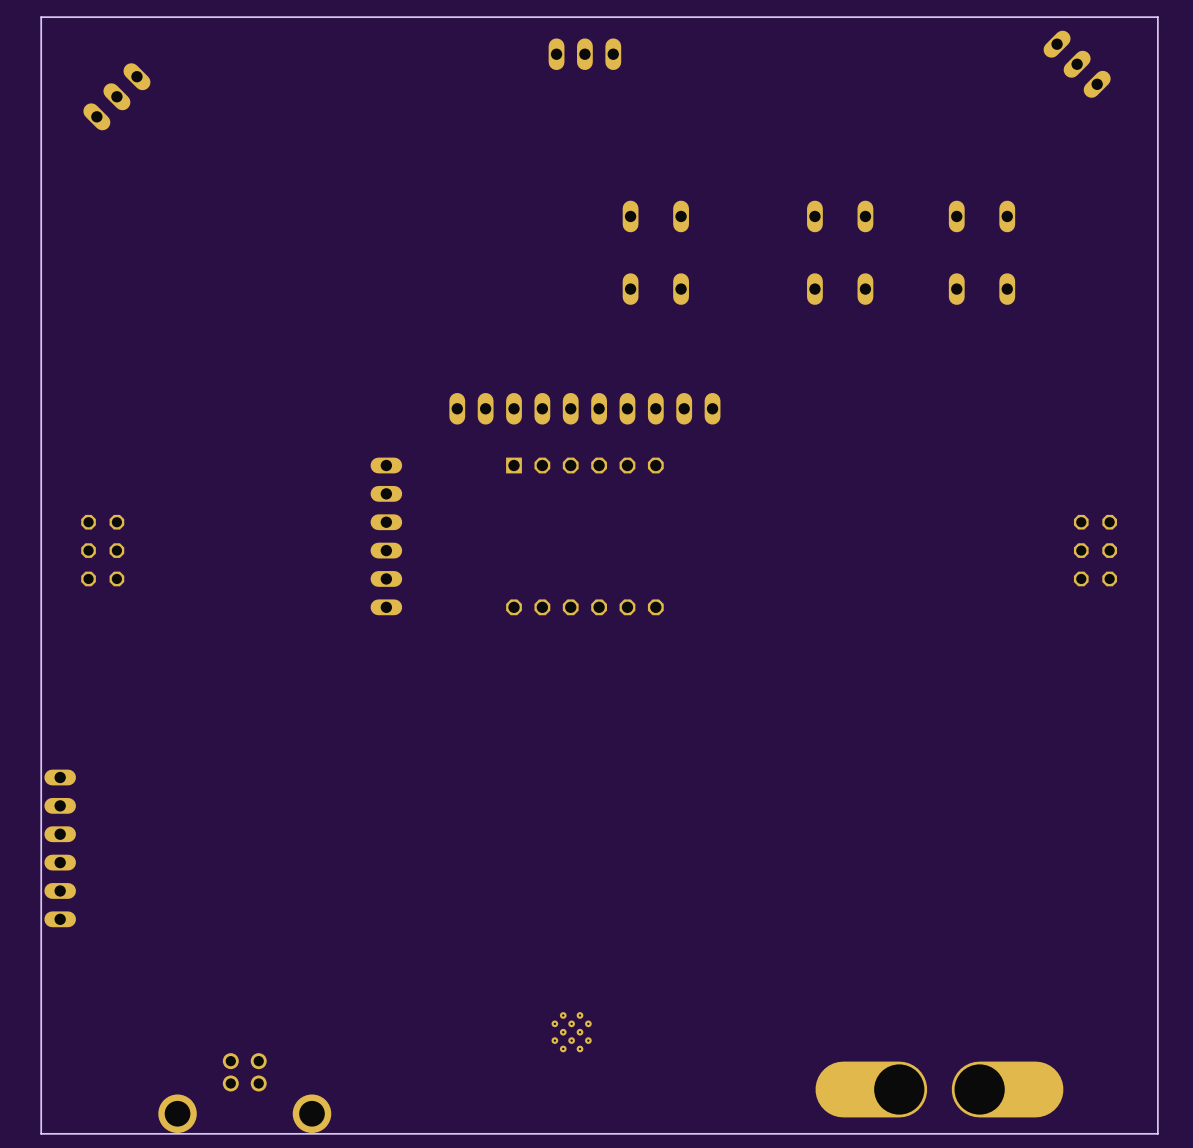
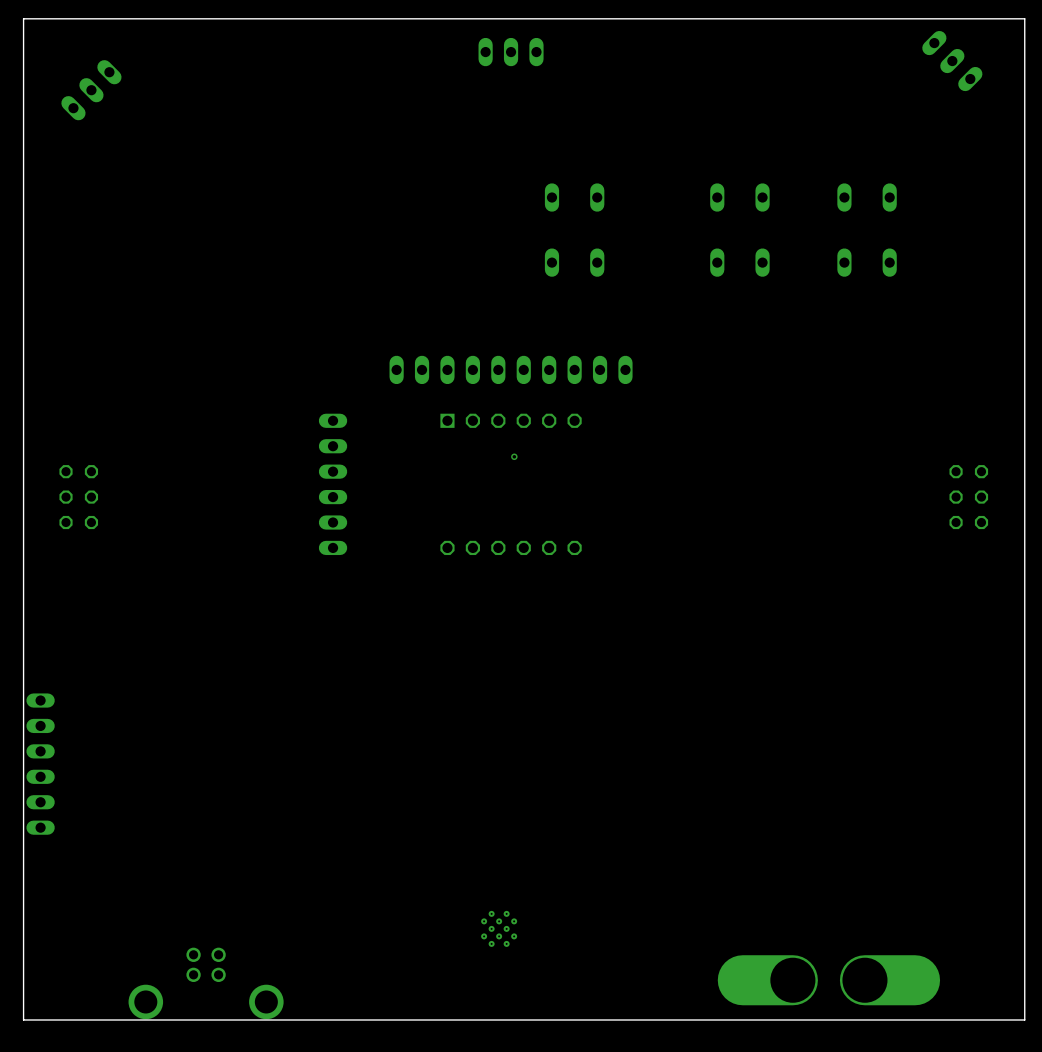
via: none -> (514, 456)

